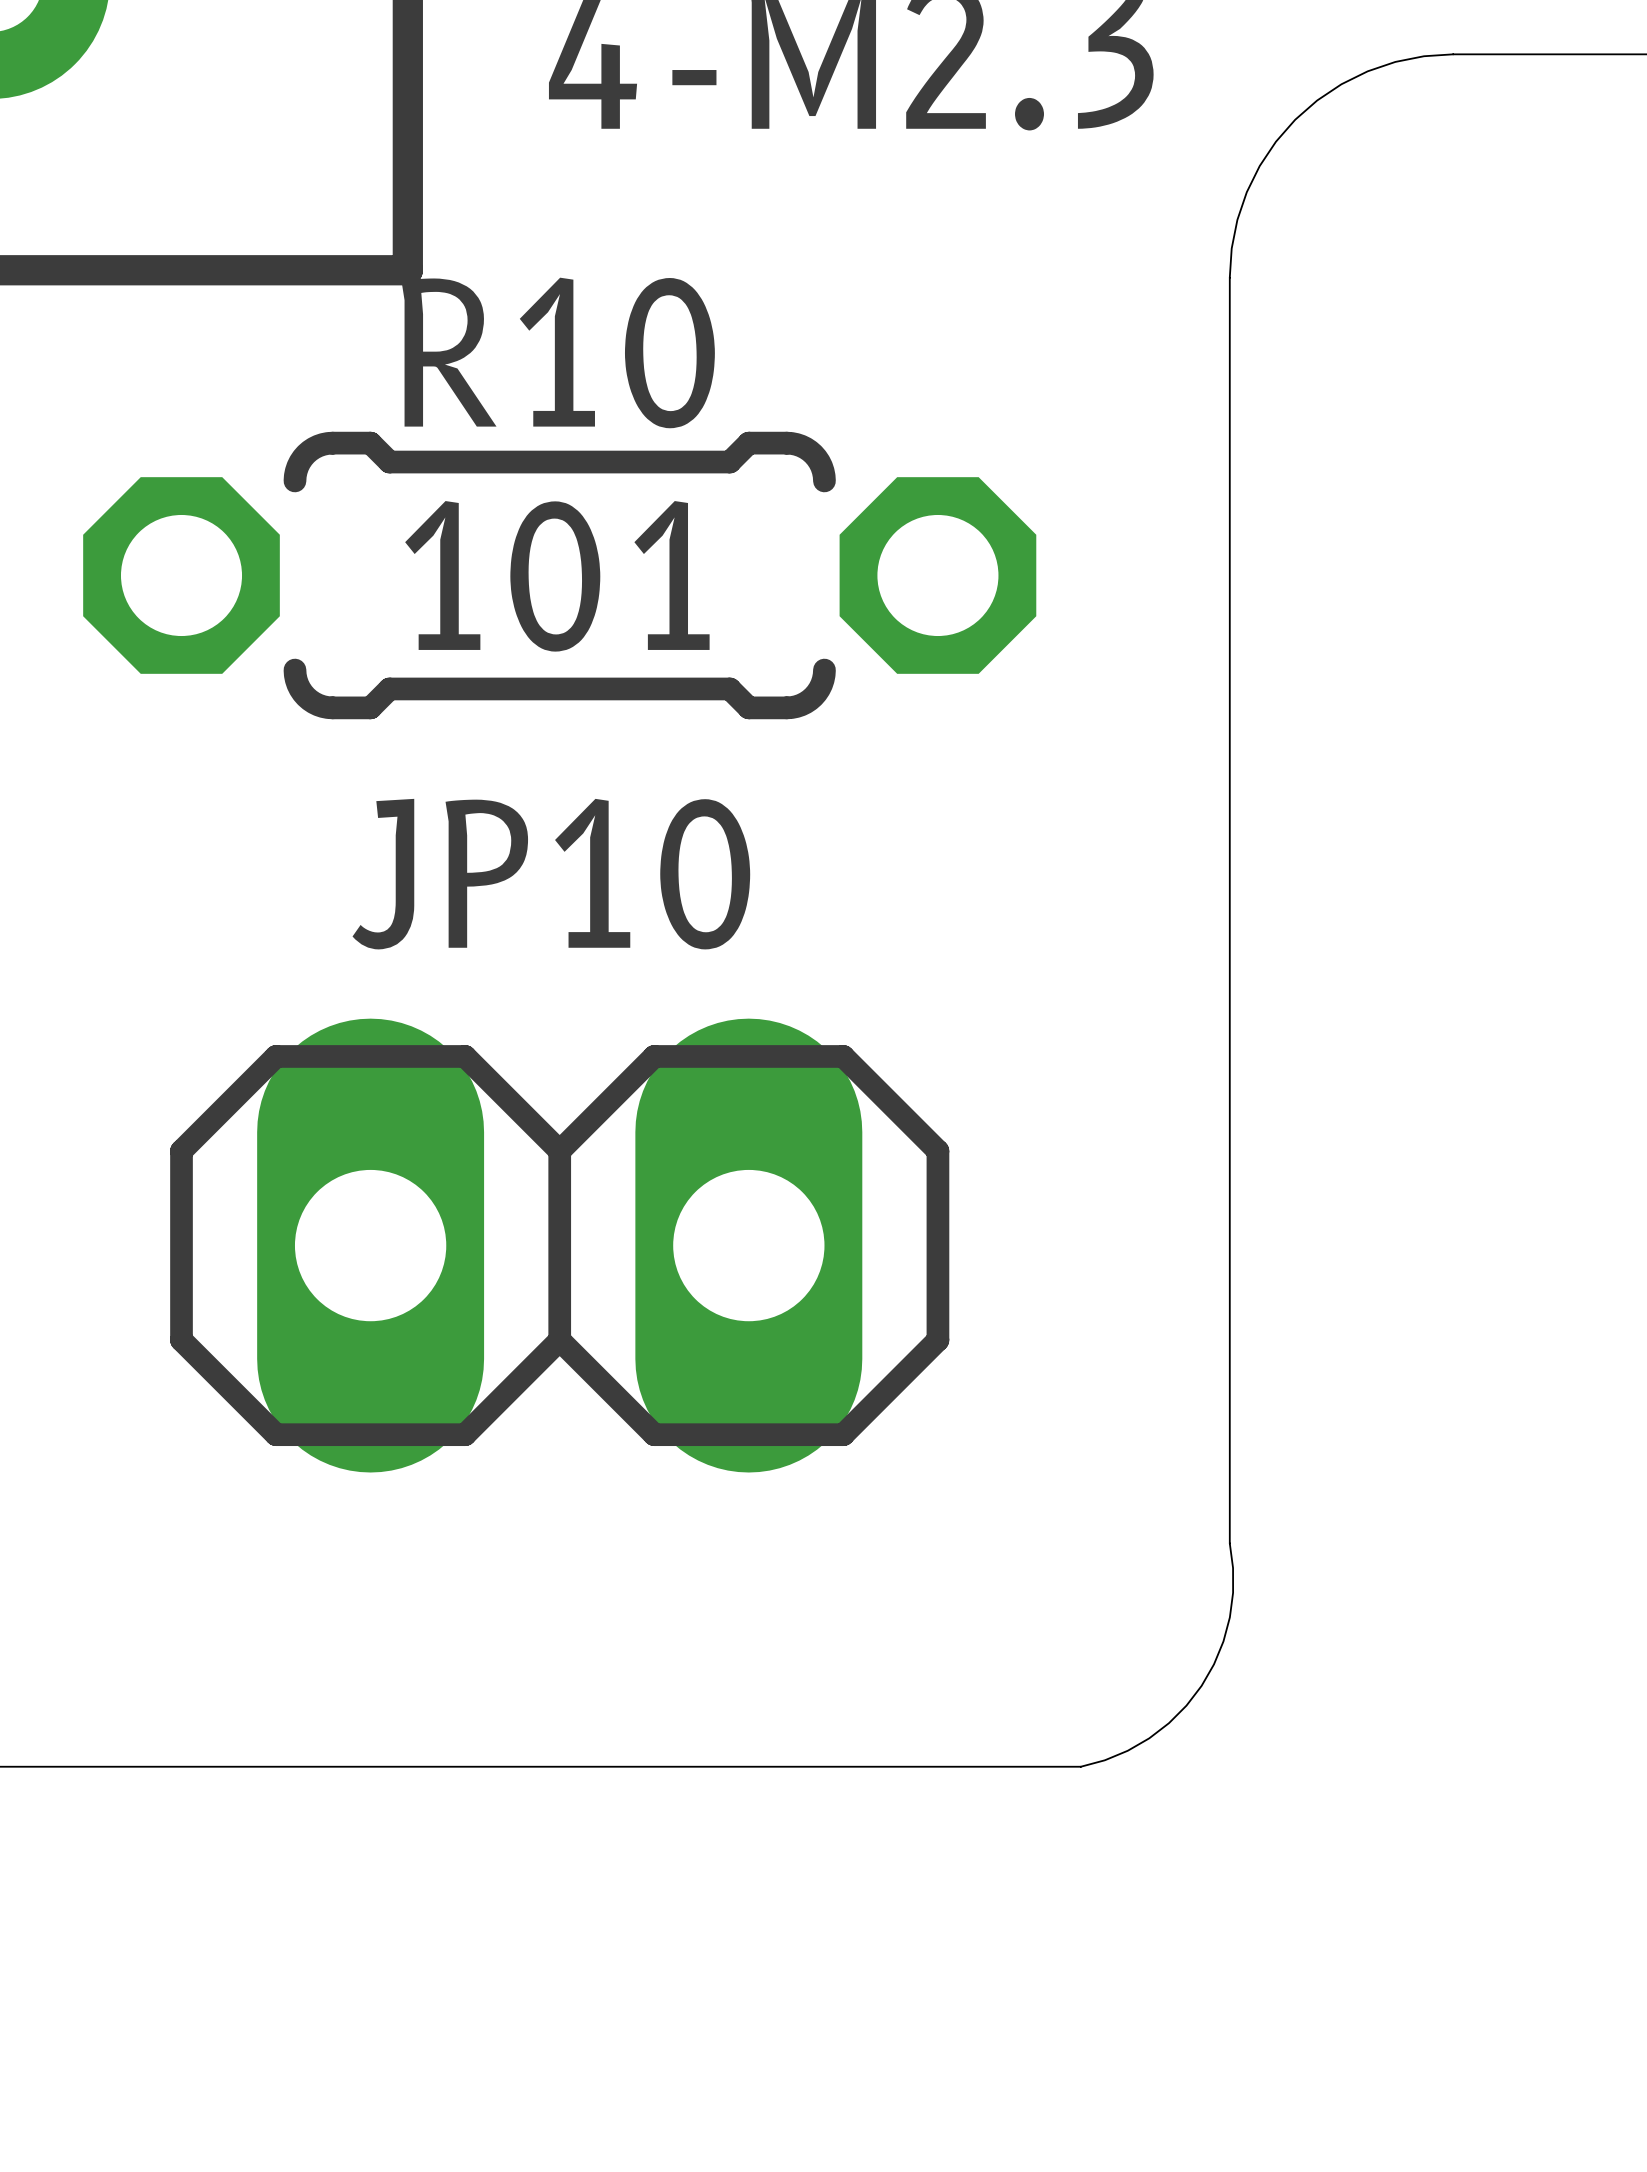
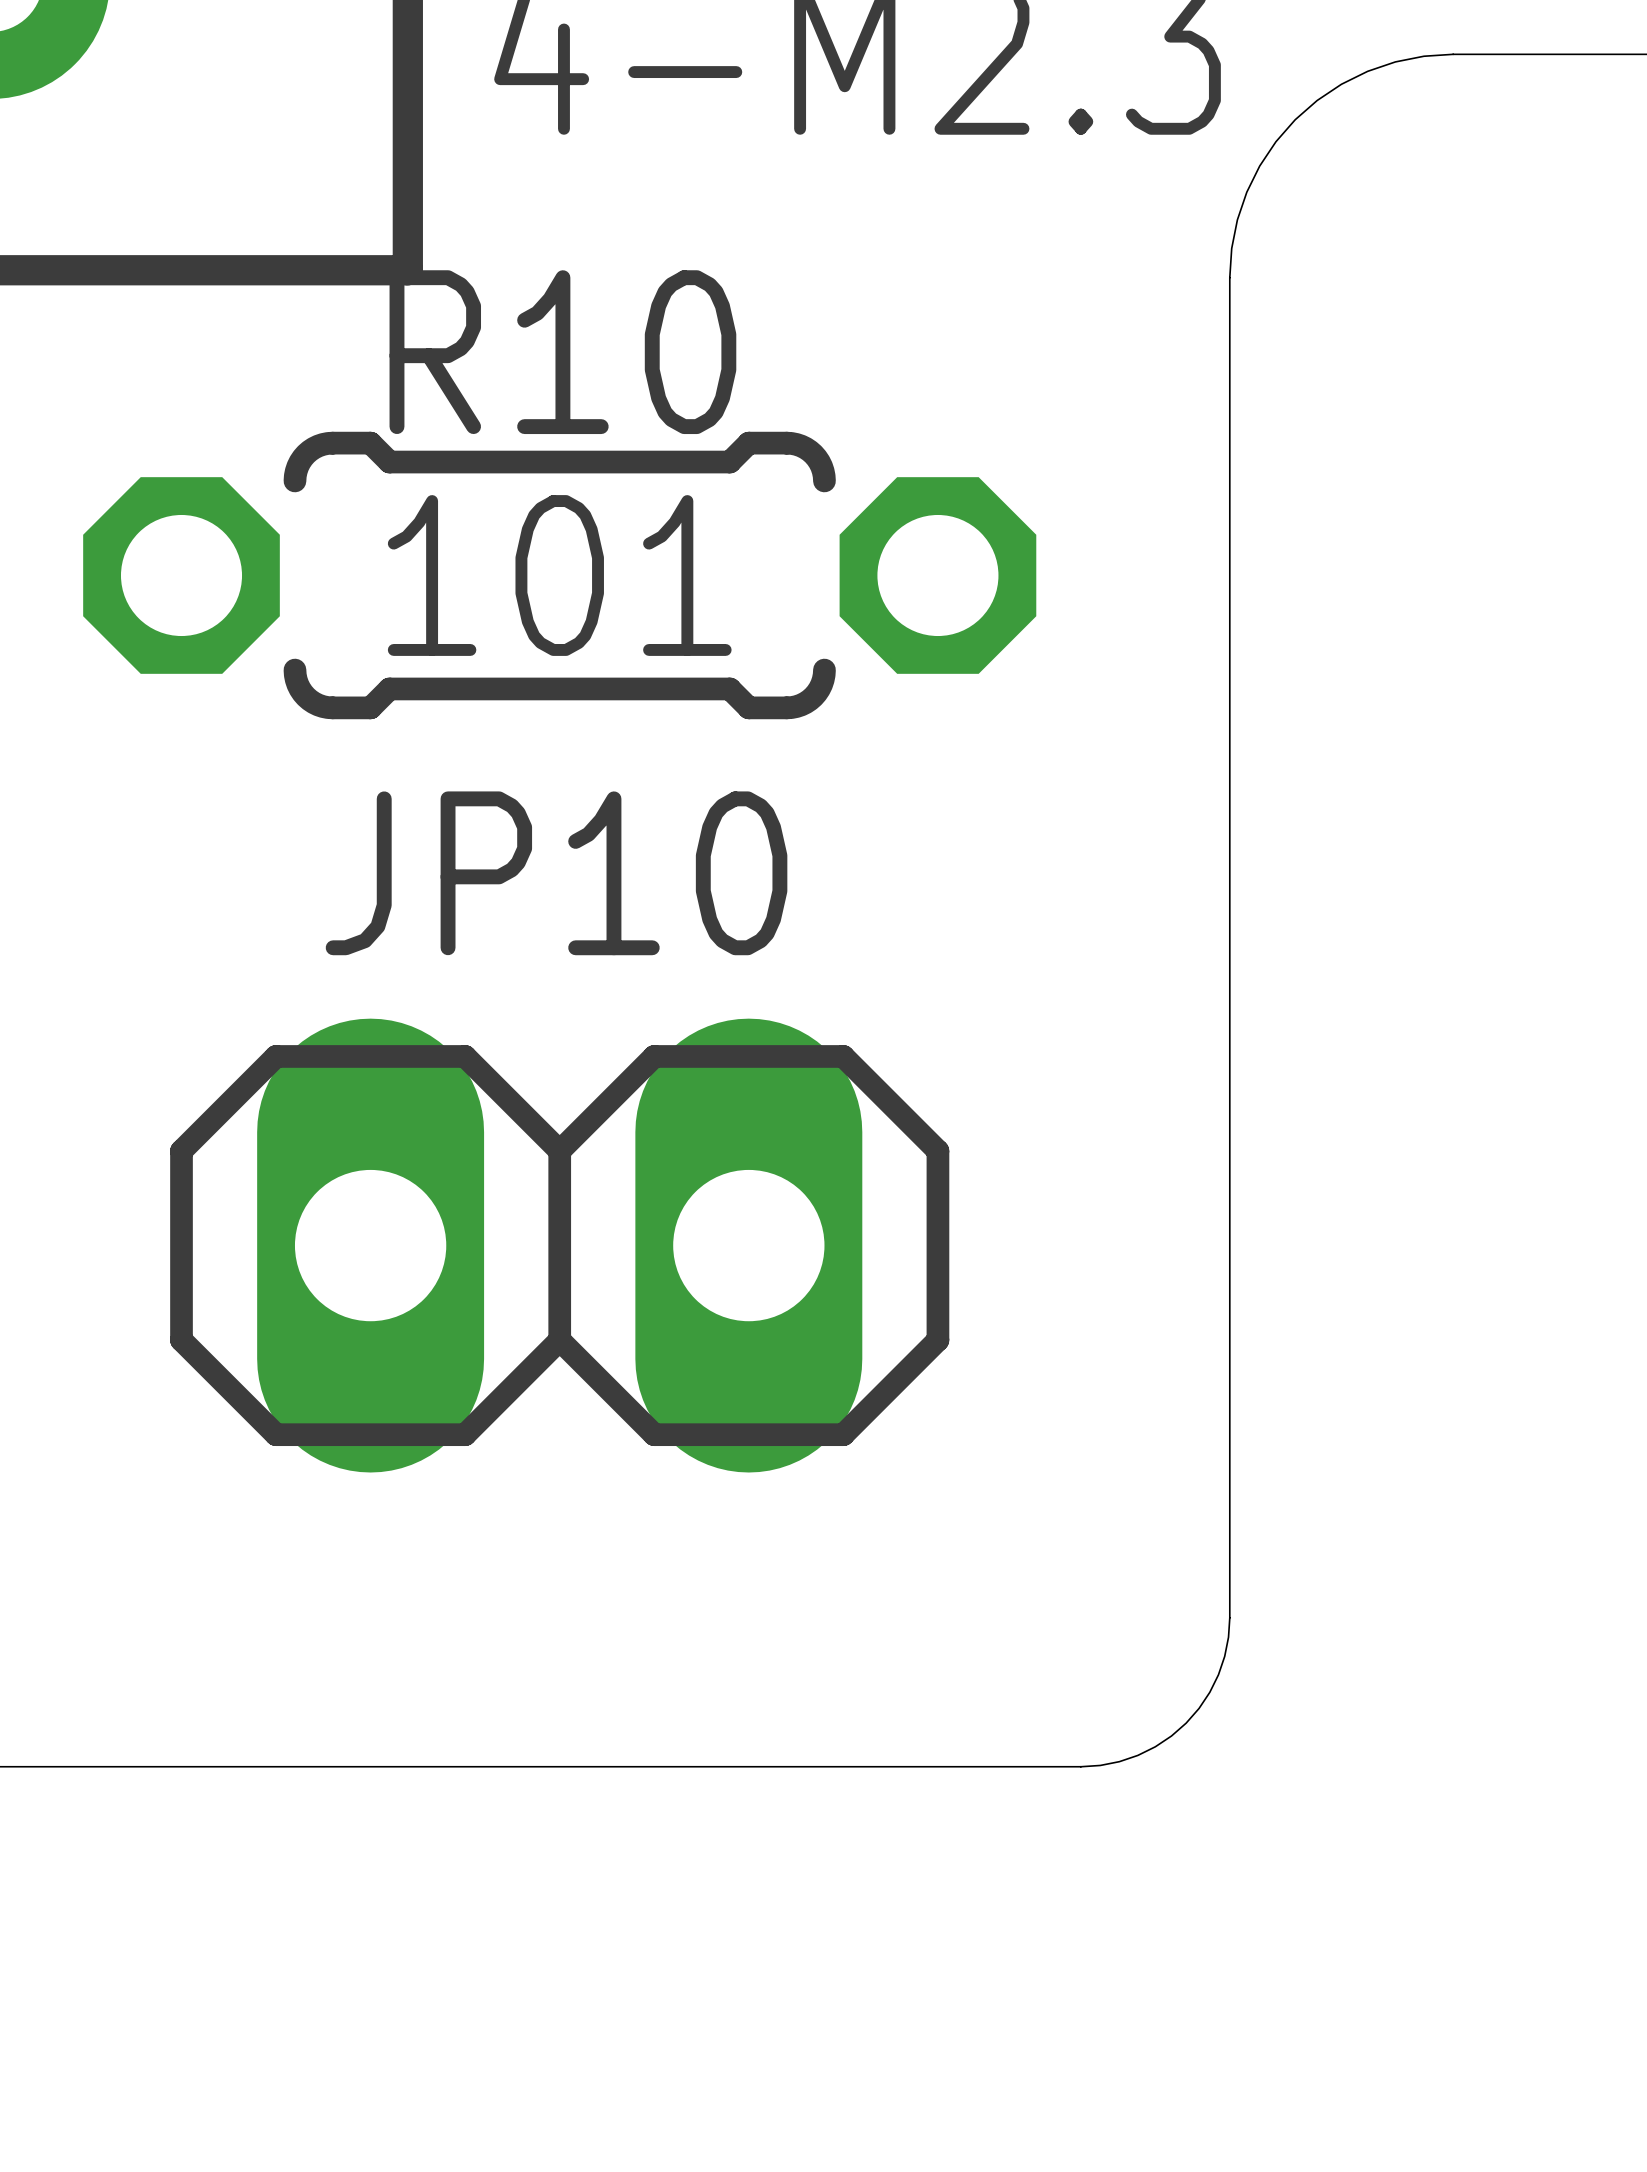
board edge: (1229, 1543) (1233, 1568) (1233, 1592) (1229, 1617) (1223, 1641) (1214, 1664) (1201, 1685) (1186, 1705) (1168, 1723) (1149, 1738) (1127, 1750) (1104, 1760) (1080, 1766) -> (1229, 1543) (1228, 1637) (1218, 1674) (1209, 1692) (1186, 1723) (1155, 1746) (1119, 1761) (1080, 1766)

